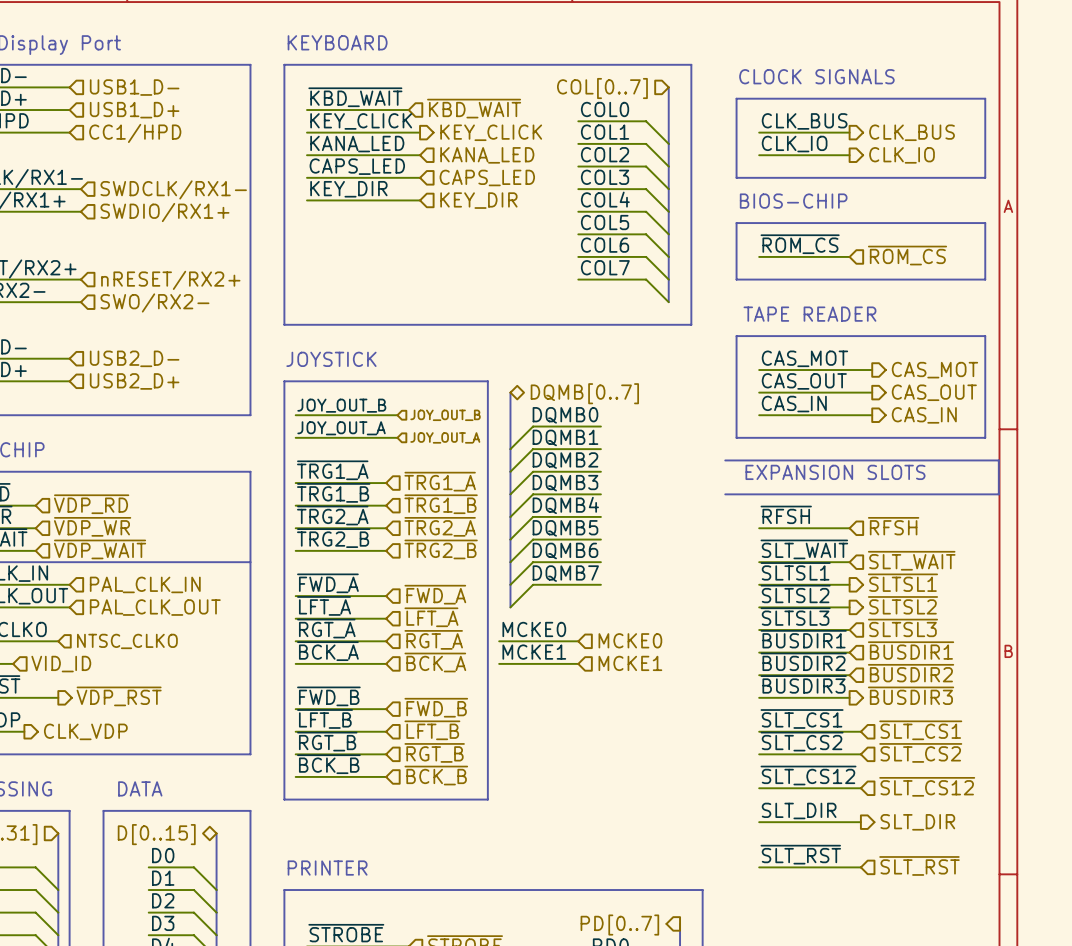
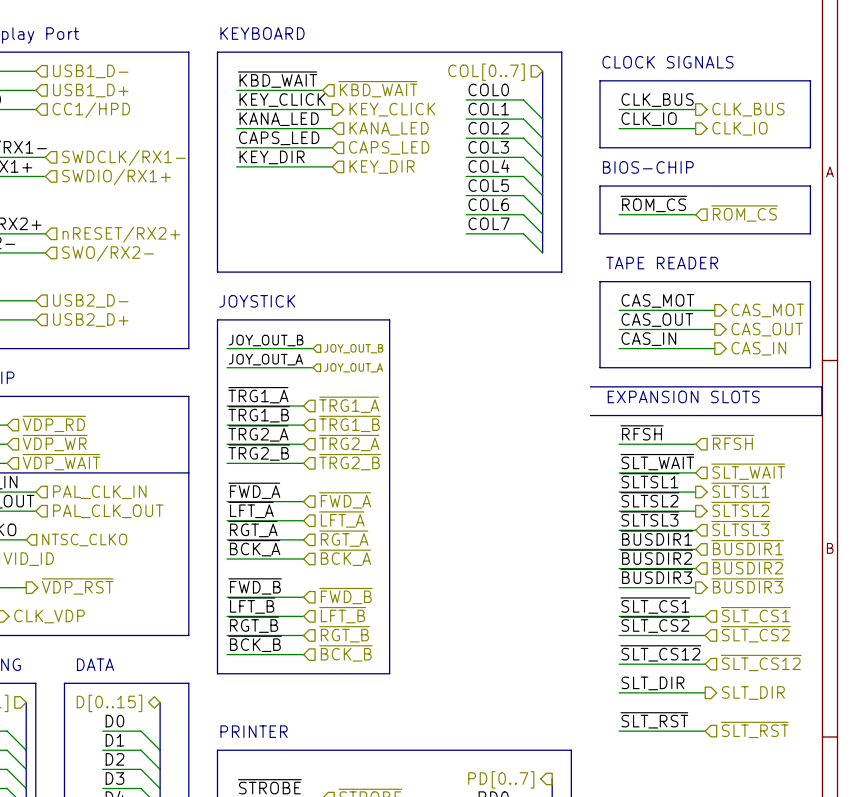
bus: (510, 392) (510, 607) -> none
hierarchical label: DQMB[0..7] (584, 393) -> none
label: DQMB0 (565, 415) -> none
wire: (600, 426) (533, 426) (510, 449) -> none
label: DQMB1 (565, 437) -> none
wire: (600, 449) (533, 449) (510, 471) -> none
label: DQMB2 (565, 460) -> none
wire: (600, 471) (533, 471) (510, 494) -> none
label: DQMB3 (565, 483) -> none
wire: (600, 494) (533, 494) (510, 516) -> none
label: DQMB4 (565, 505) -> none
wire: (600, 516) (533, 516) (510, 539) -> none
label: DQMB5 (565, 528) -> none
wire: (600, 539) (533, 539) (510, 562) -> none
label: DQMB6 (565, 550) -> none
wire: (600, 562) (533, 562) (510, 584) -> none
label: DQMB7 (565, 573) -> none
wire: (600, 584) (533, 584) (510, 607) -> none
label: MCKE0 (534, 629) -> none
hierarchical label: MCKE0 (630, 640) -> none
wire: (499, 641) (578, 641) -> none
label: MCKE1 (534, 652) -> none
wire: (499, 663) (578, 663) -> none
hierarchical label: MCKE1 (630, 663) -> none

